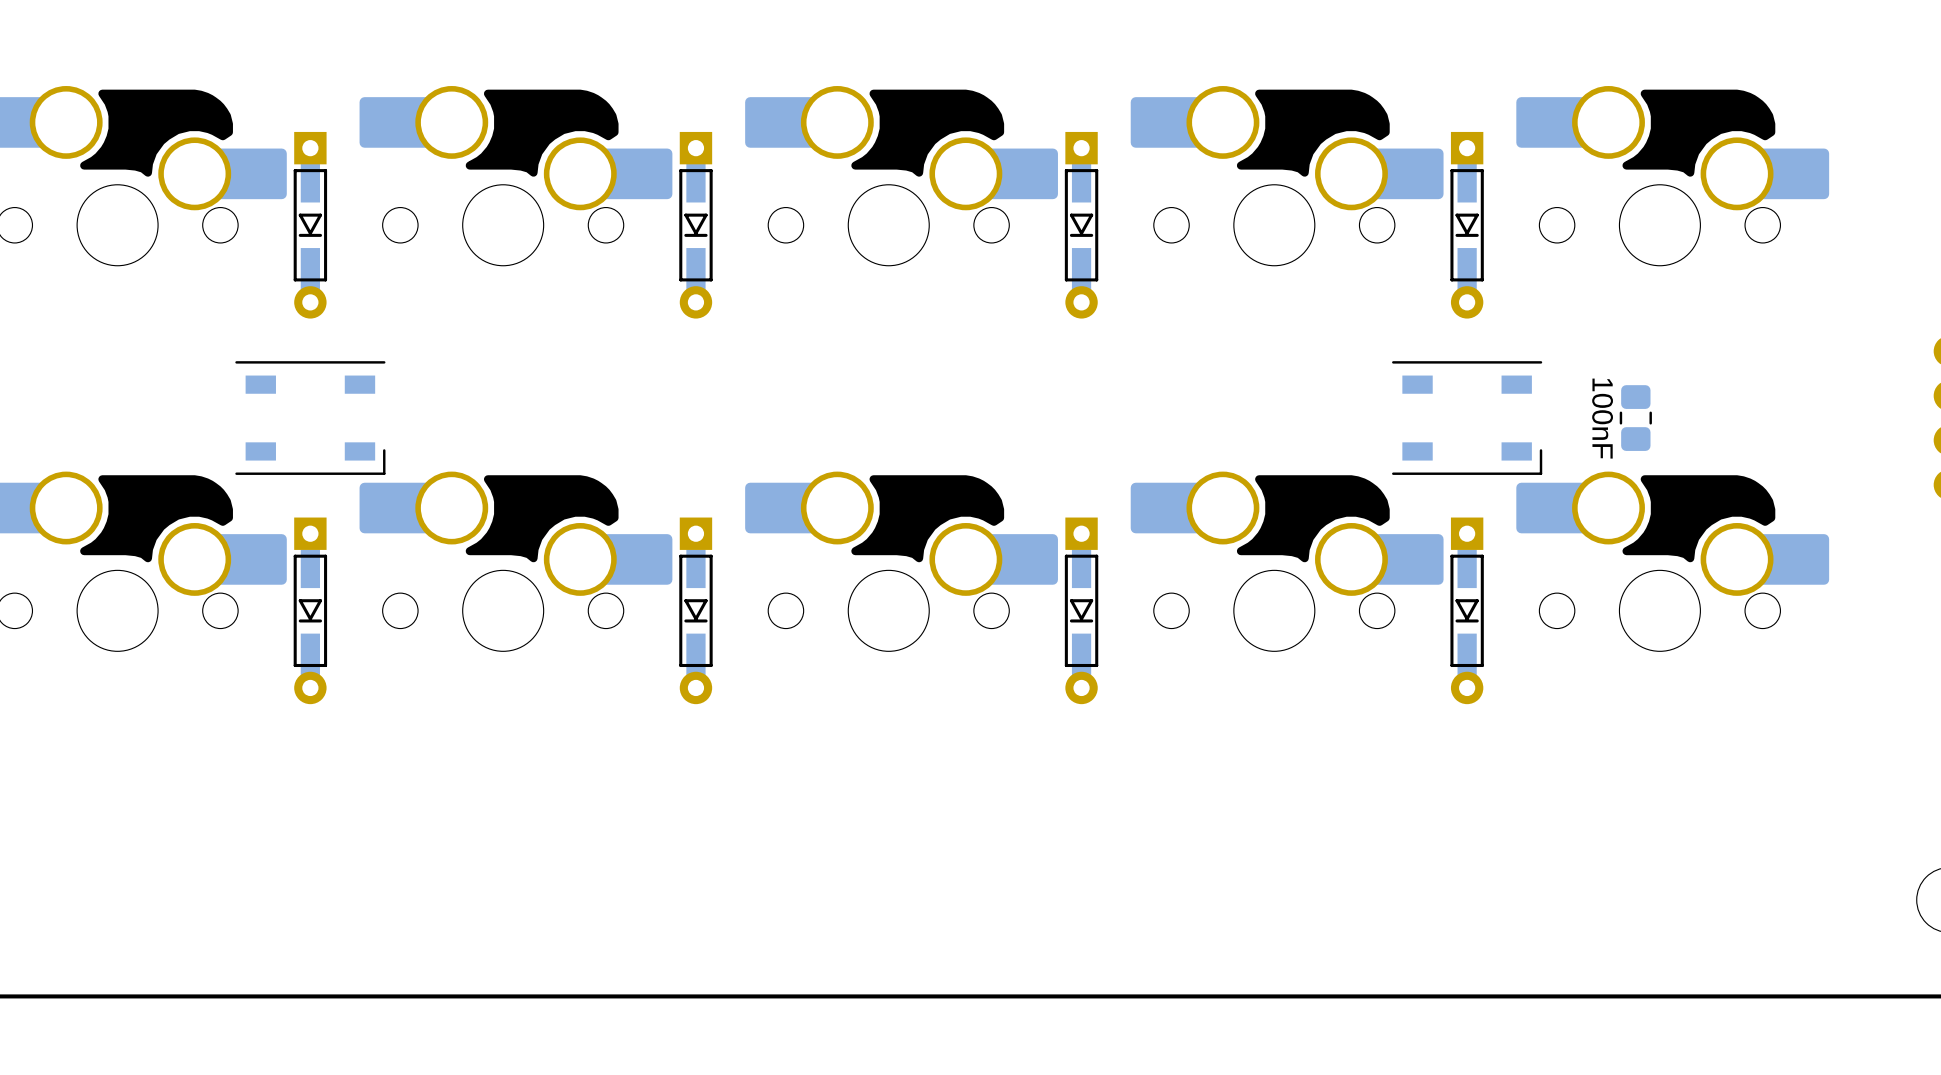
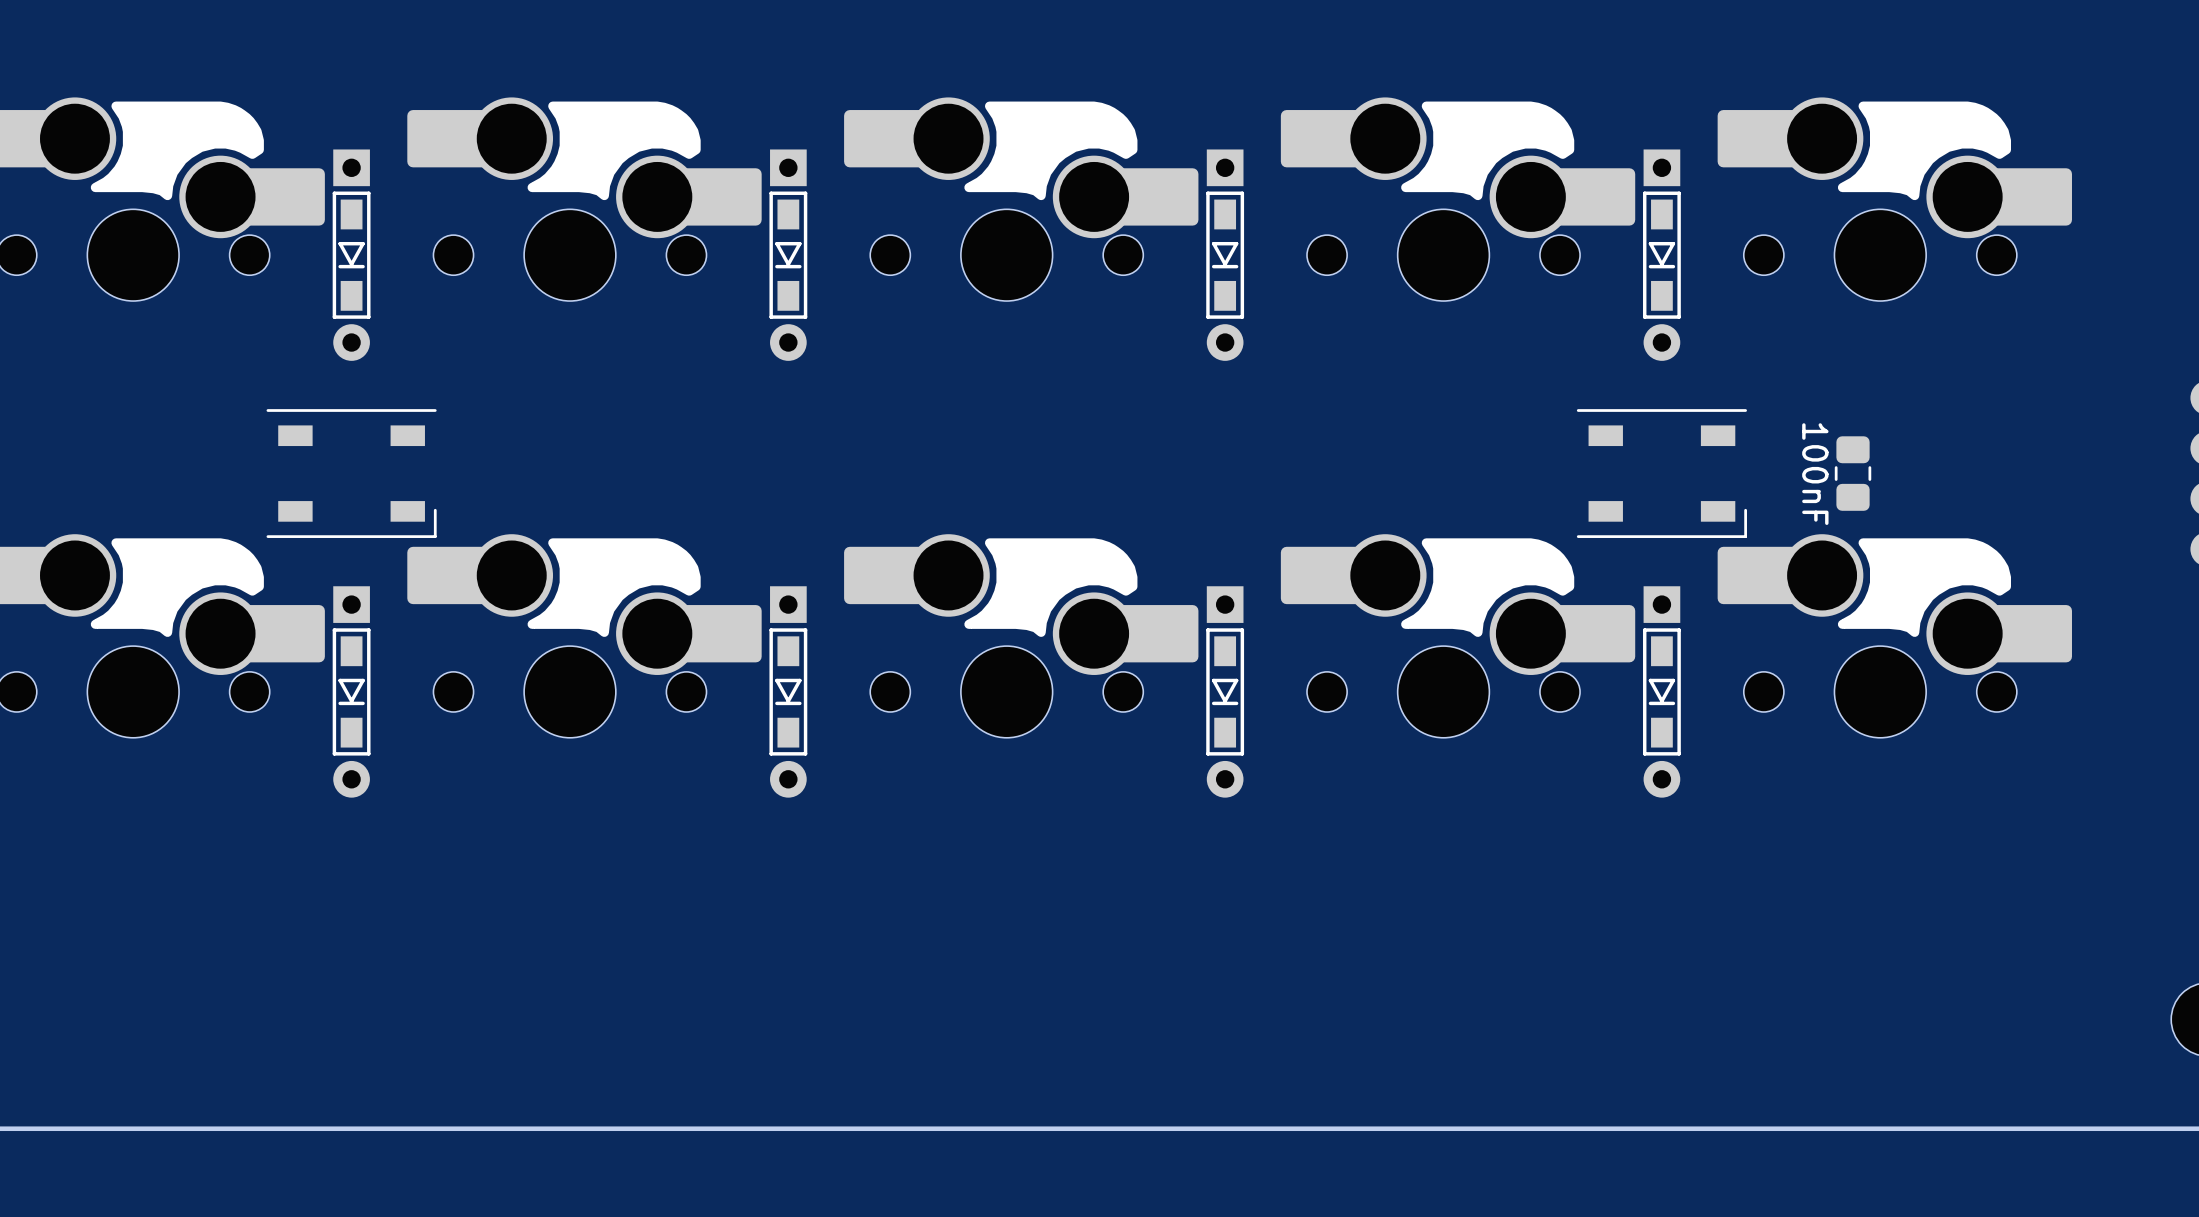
part footprint: [293, 131, 328, 319] -> [332, 149, 371, 361]
part footprint: [679, 131, 713, 319] -> [769, 149, 808, 361]
part footprint: [1064, 131, 1099, 319] -> [1206, 149, 1245, 361]
part footprint: [1450, 131, 1484, 319] -> [1643, 149, 1681, 361]
part footprint: [293, 517, 328, 705] -> [332, 586, 371, 798]
part footprint: [679, 517, 713, 705] -> [769, 586, 808, 798]
part footprint: [1064, 517, 1099, 705] -> [1206, 586, 1245, 798]
part footprint: [1450, 517, 1484, 705] -> [1643, 586, 1681, 798]

